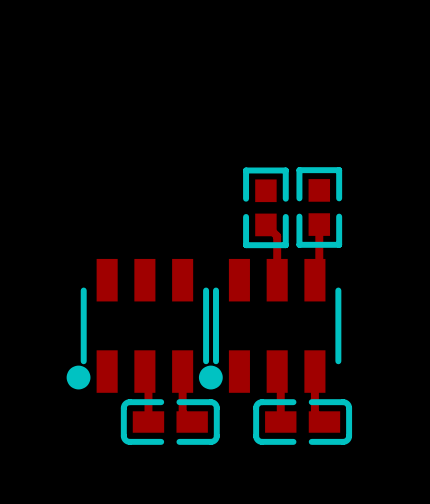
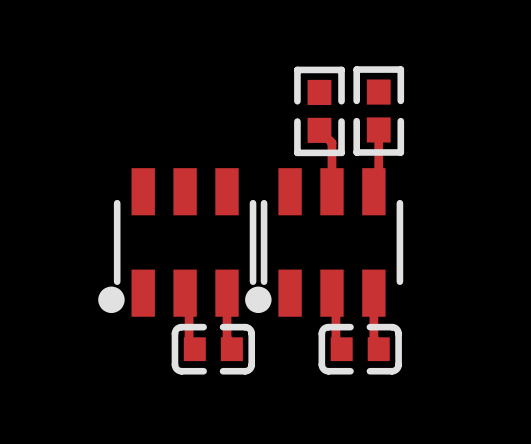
part footprint: [120, 399, 220, 445] -> [171, 323, 256, 375]
part footprint: [253, 399, 353, 445] -> [318, 323, 402, 375]

